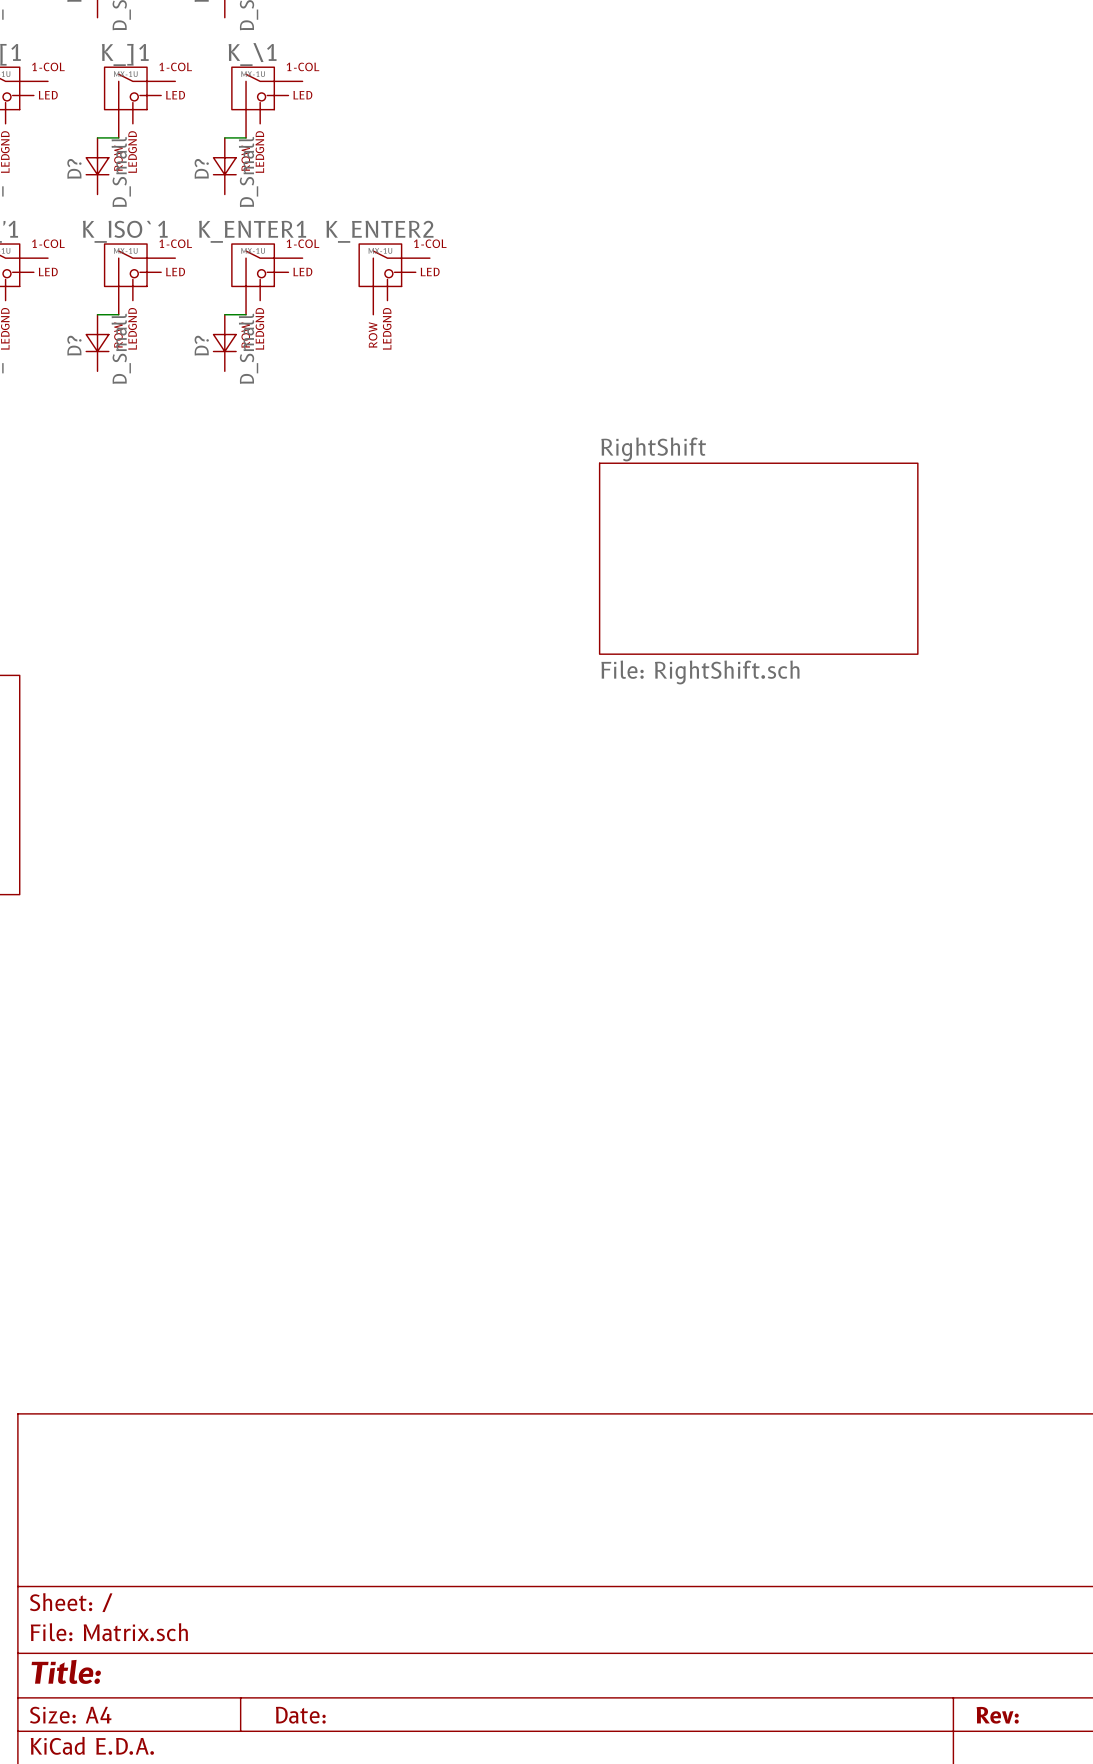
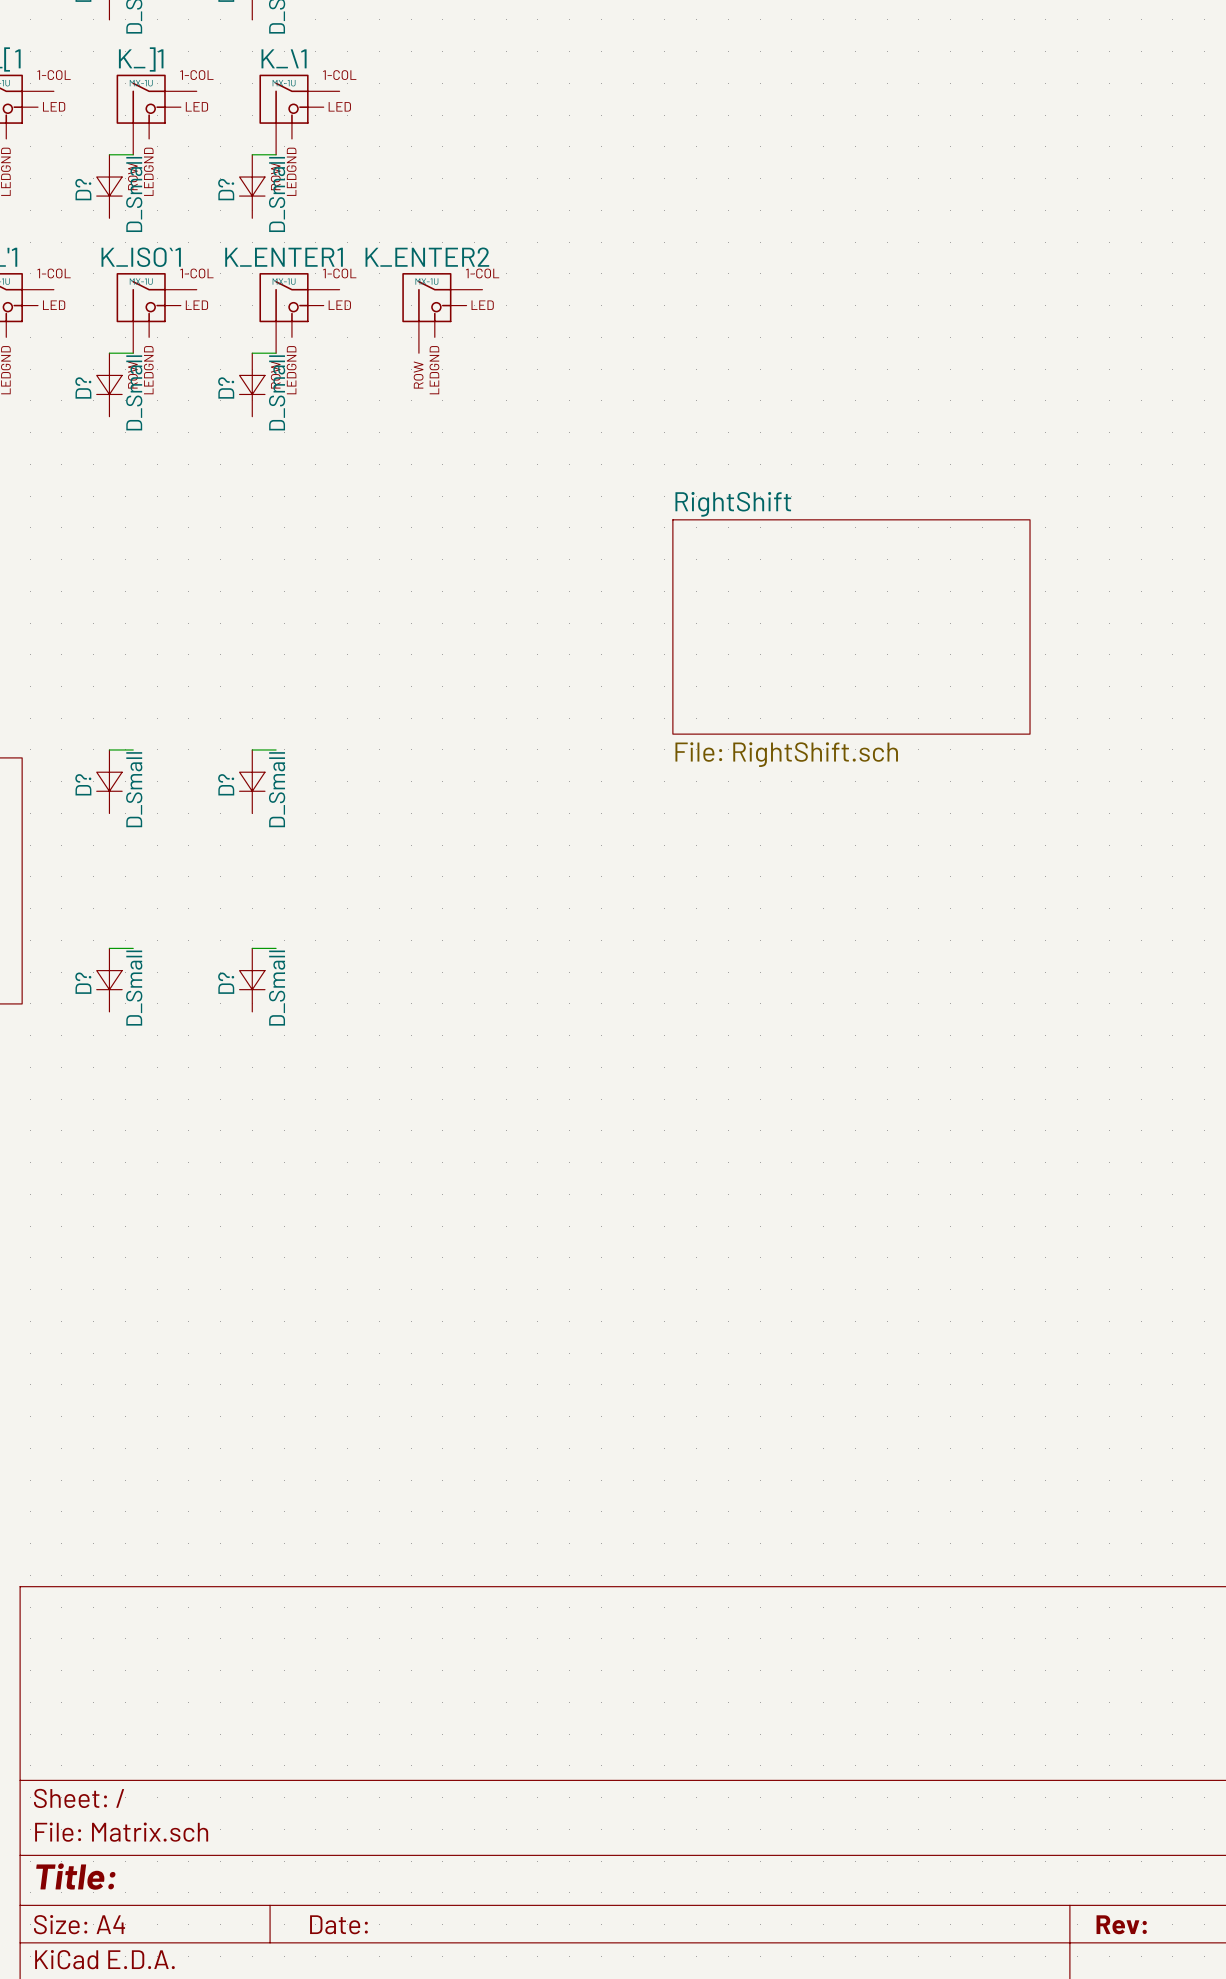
wire: none -> (109, 749) (133, 749)
wire: none -> (252, 749) (276, 749)
D?: none -> D_Small (109, 781)
D?: none -> D_Small (252, 781)
wire: none -> (109, 948) (133, 948)
wire: none -> (252, 948) (276, 948)
D?: none -> D_Small (109, 980)
D?: none -> D_Small (252, 980)

